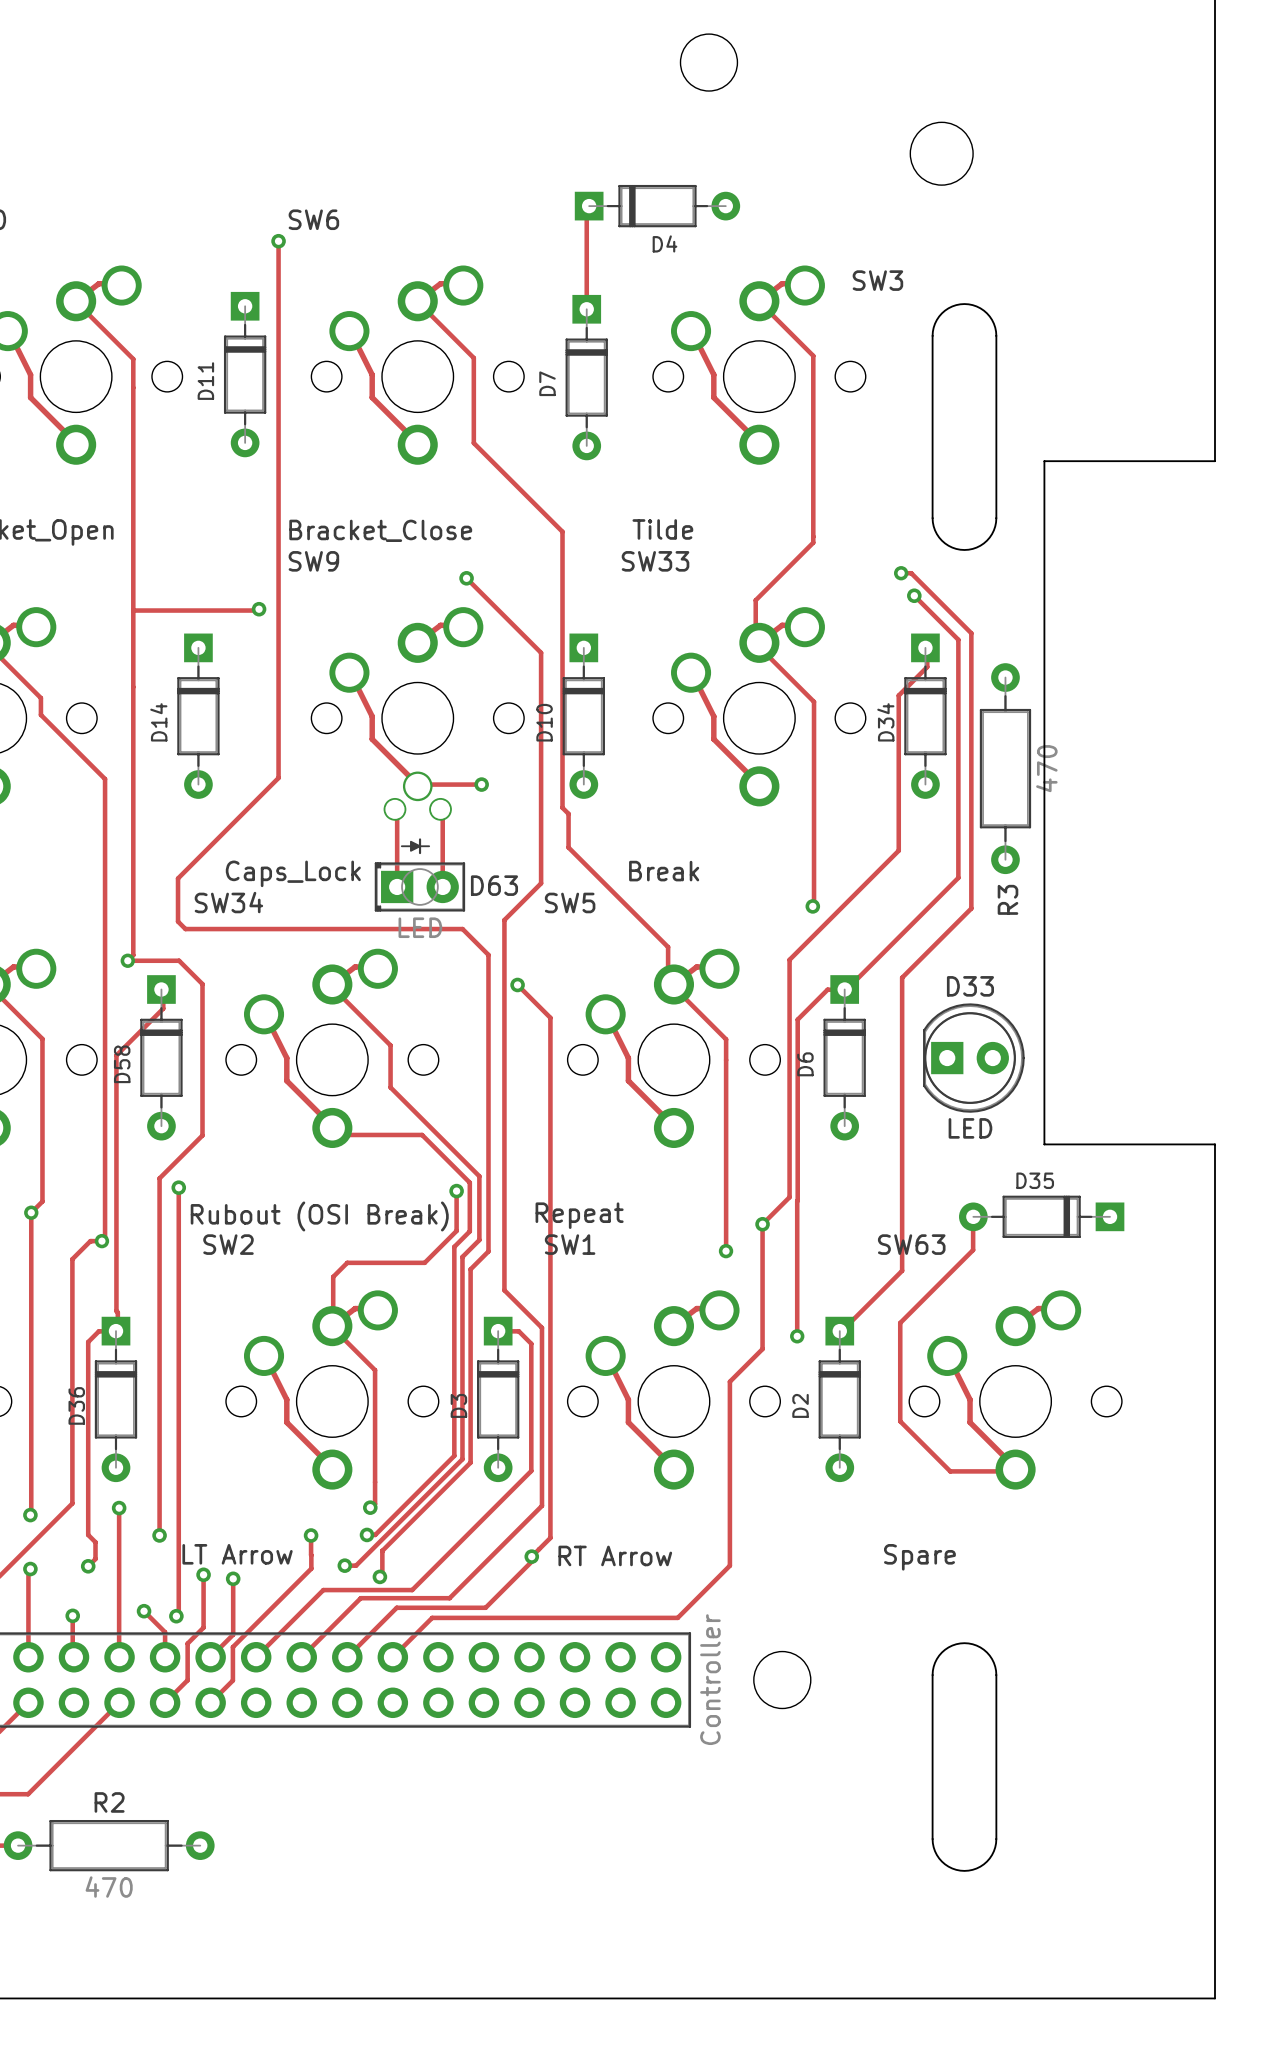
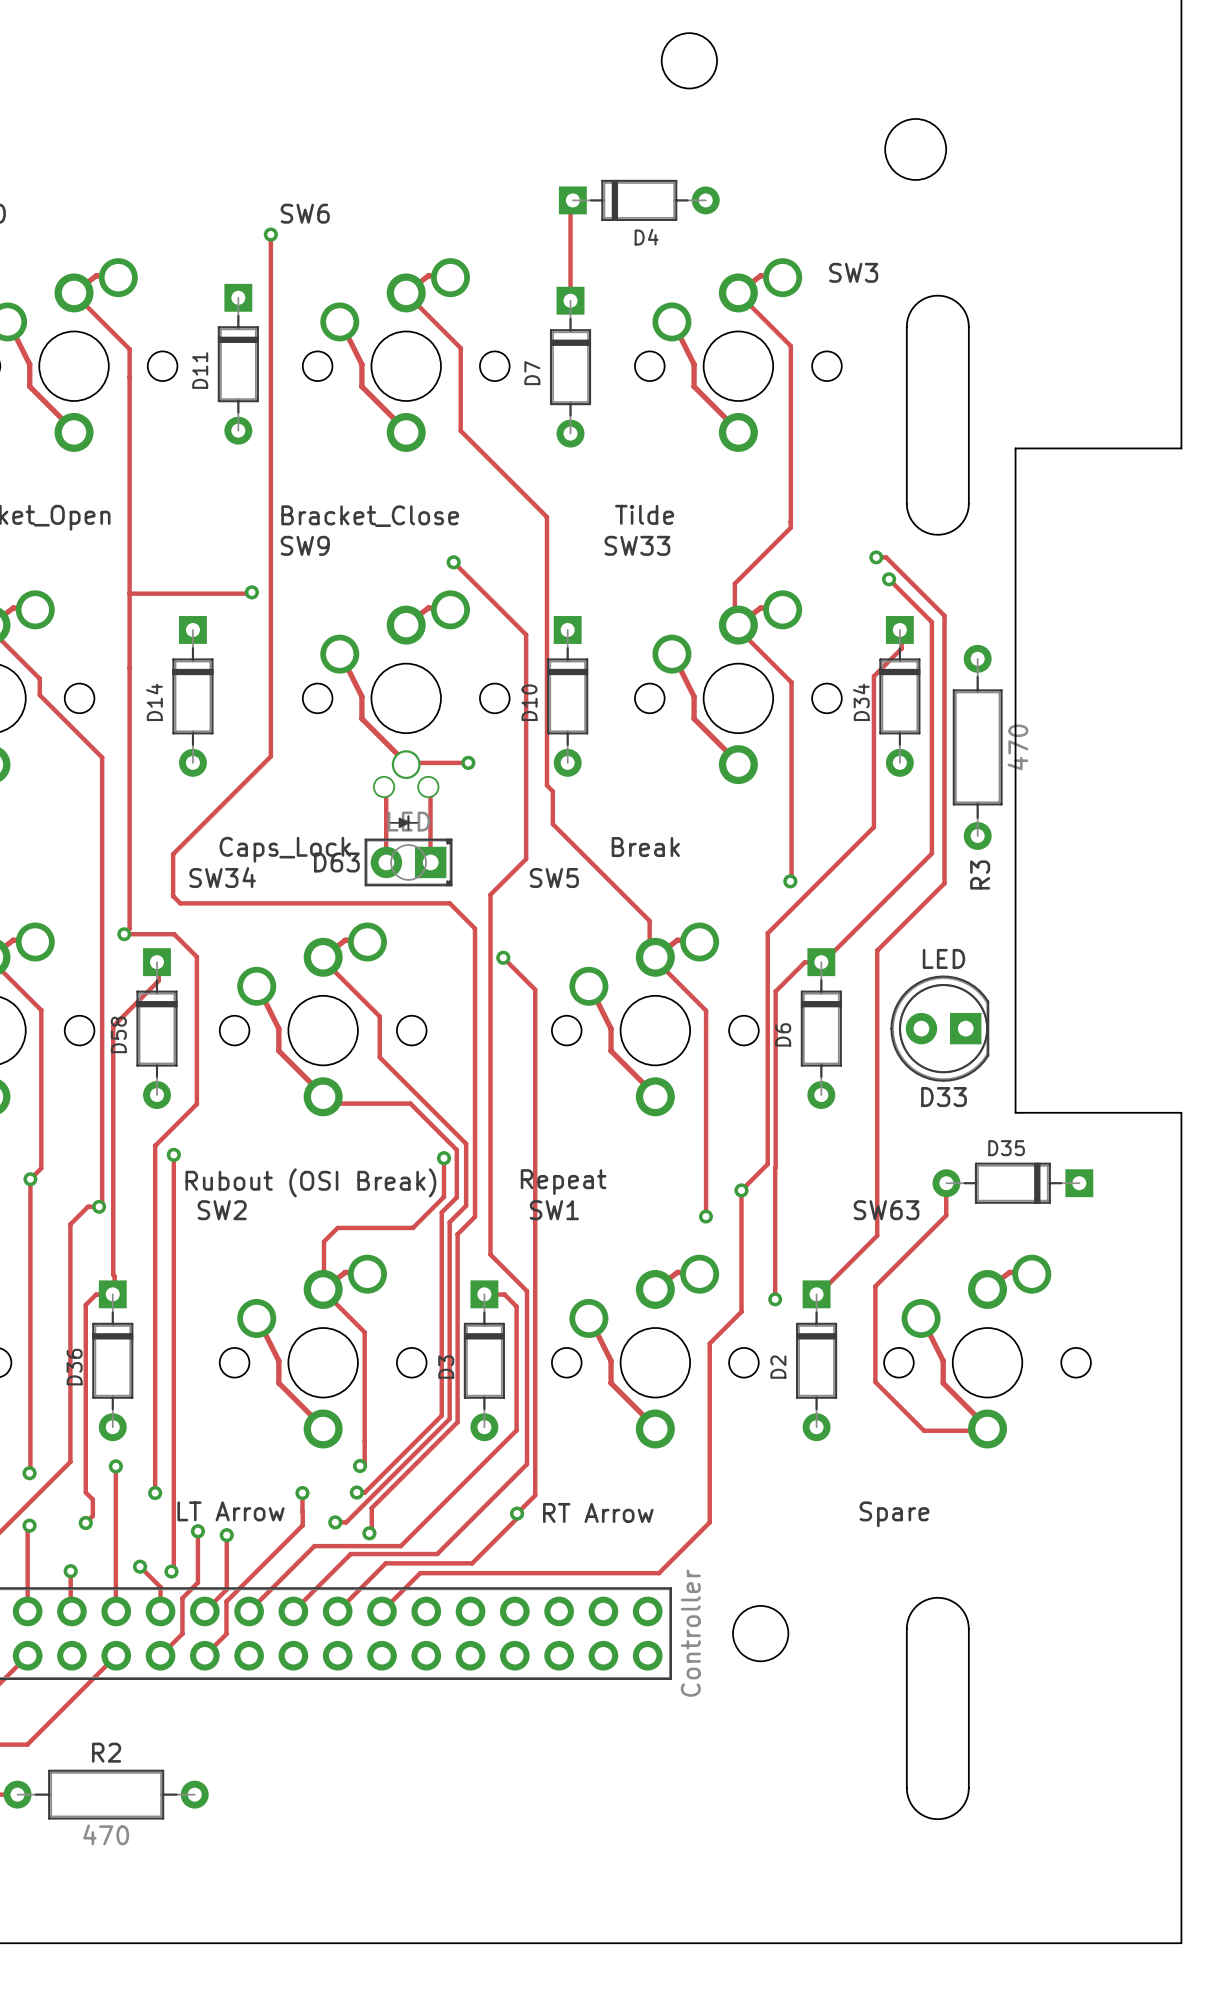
D63 rotation: 0° (419, 886) -> 180° (408, 862)
D33 rotation: 0° (973, 1058) -> 180° (939, 1028)

